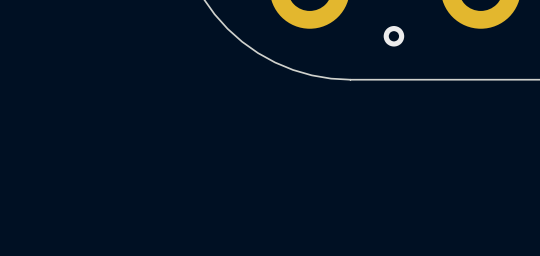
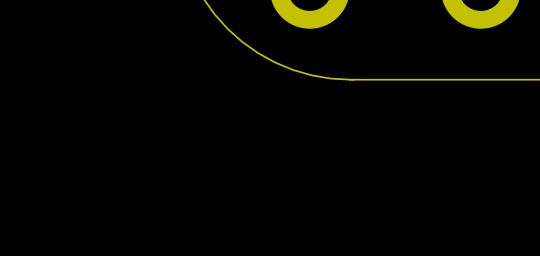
via: (393, 36) -> none

